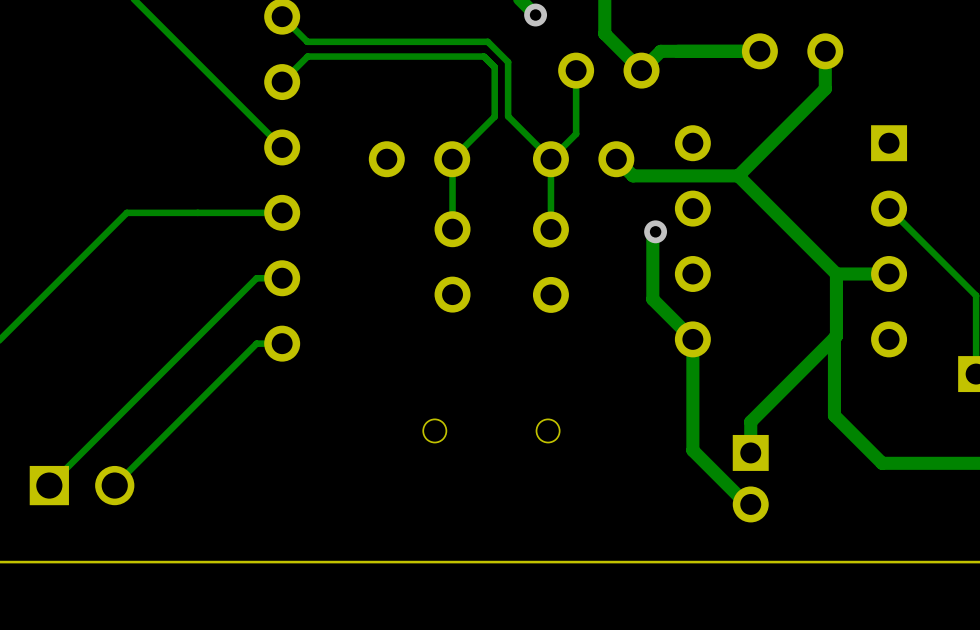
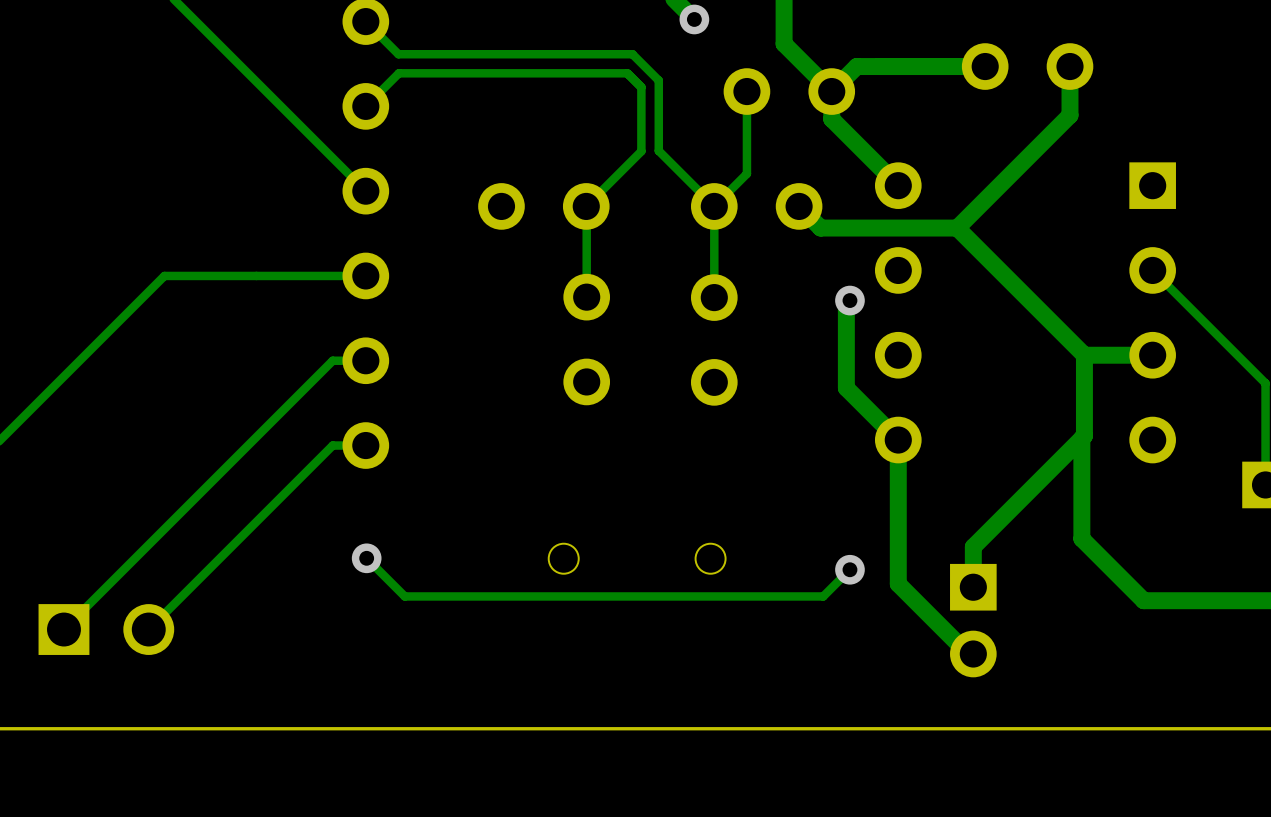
track: none -> (831, 91) (831, 119) (898, 185)
track: none -> (366, 558) (404, 596) (823, 596) (849, 569)
via: none -> (366, 558)
via: none -> (849, 569)

